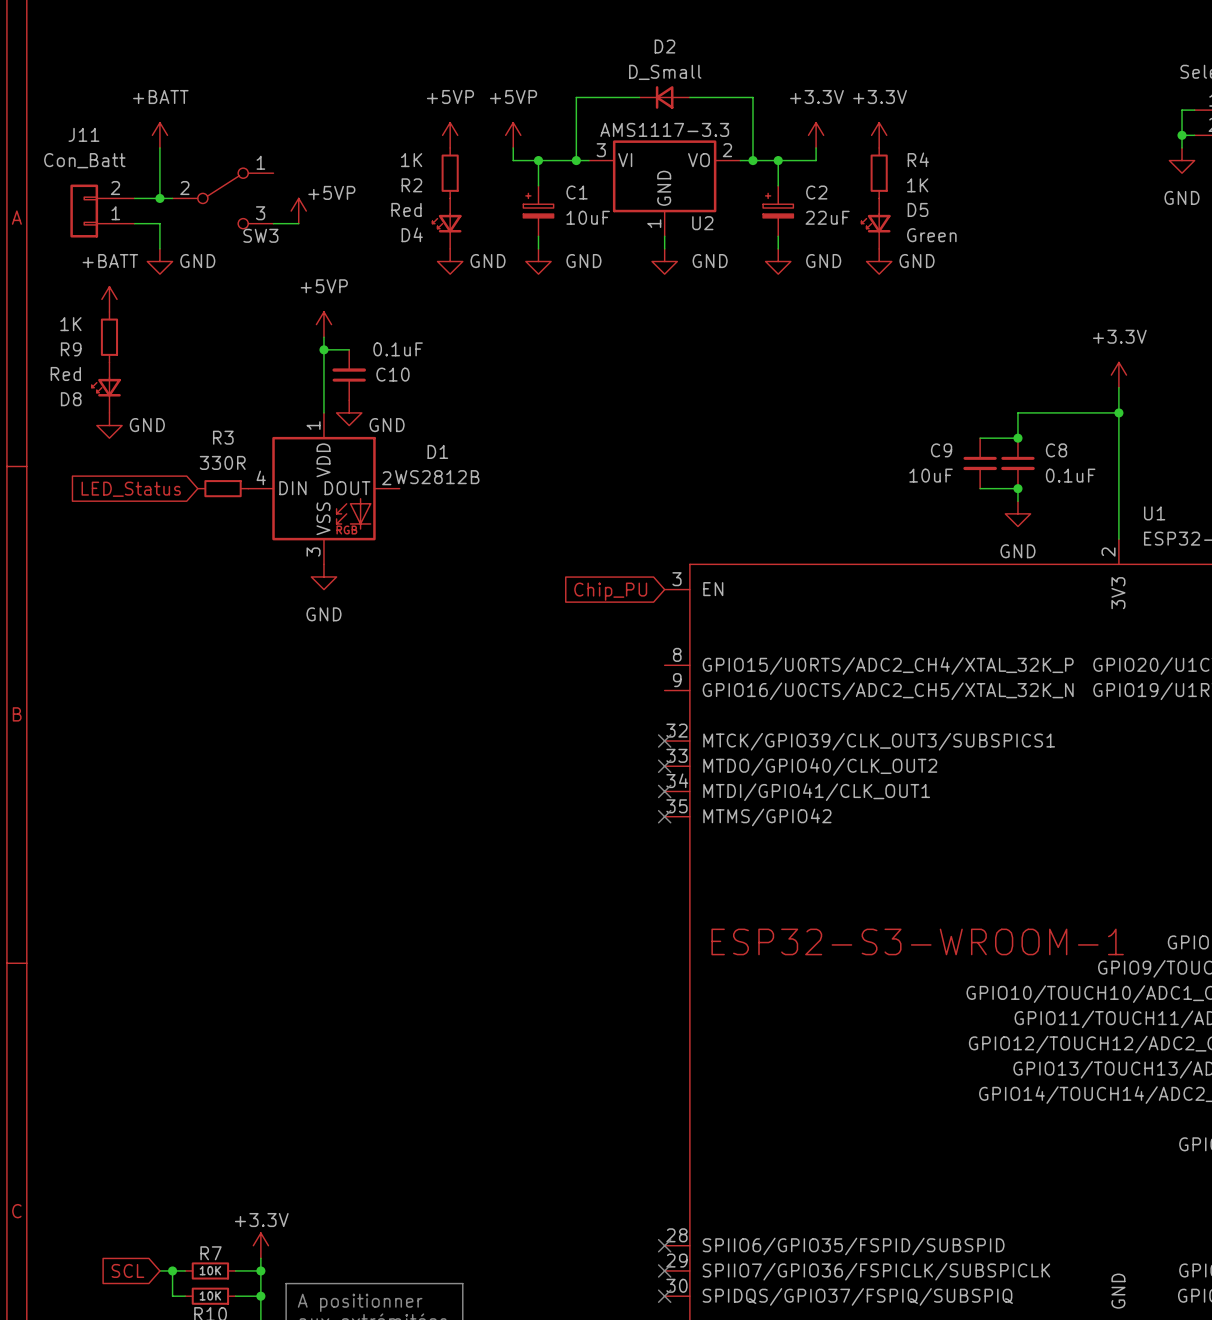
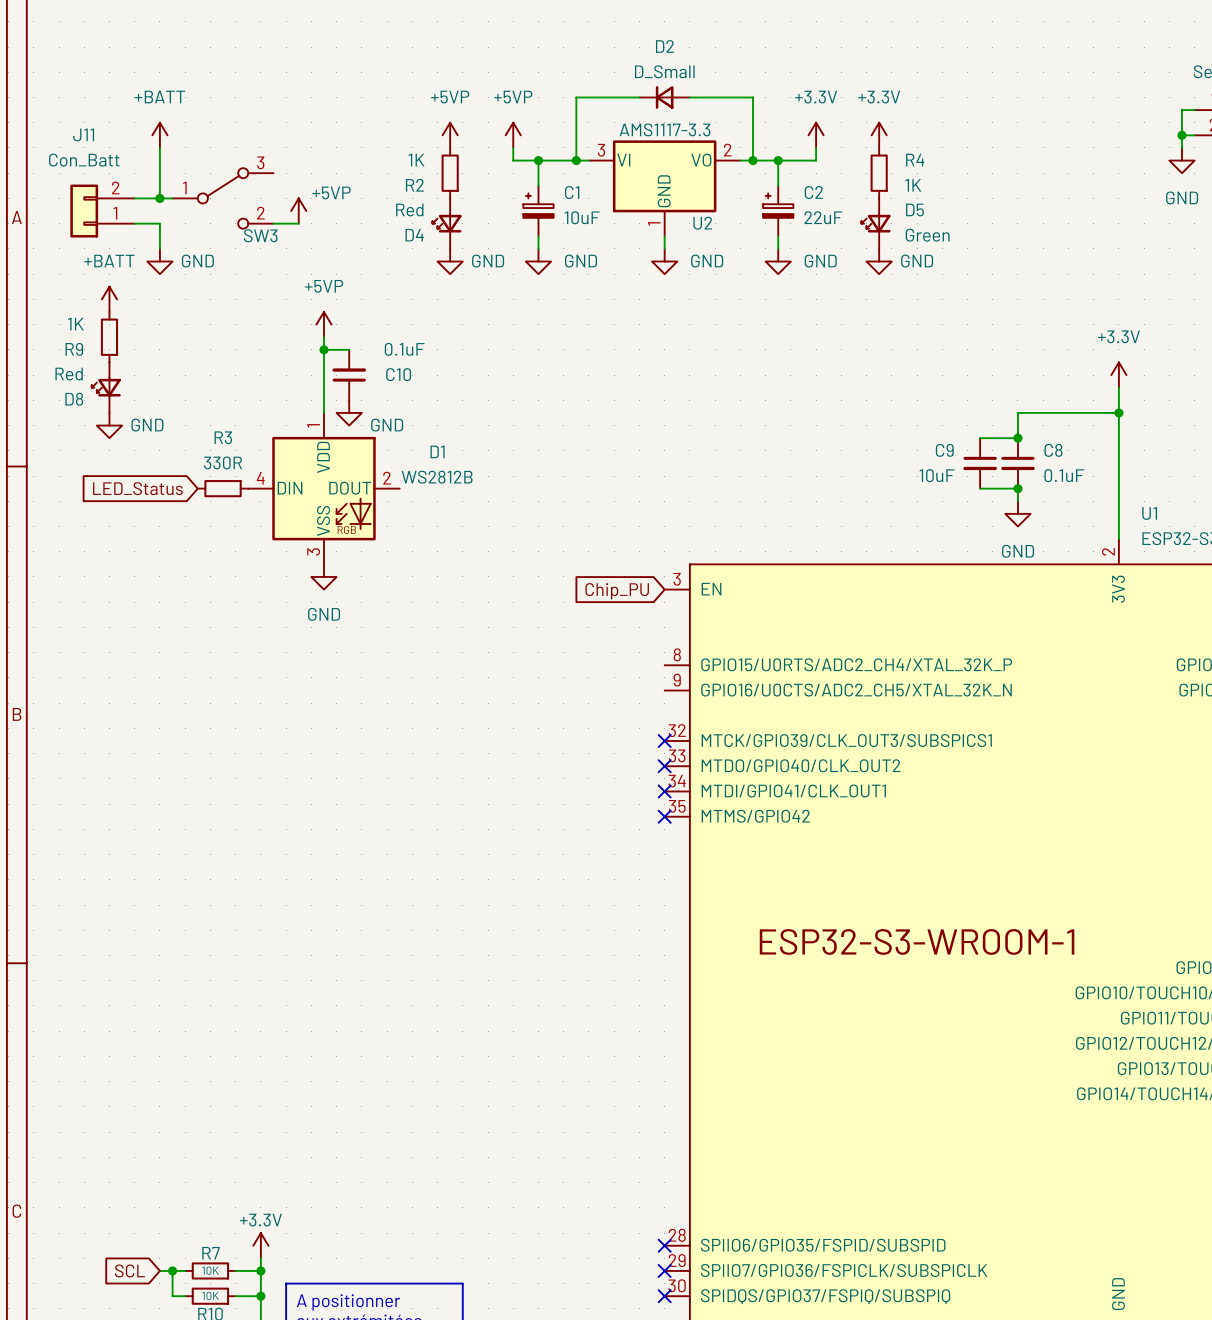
SW3 pin number: 1 (260, 162) -> 3 (260, 162)
SW3 pin number: 2 (184, 188) -> 1 (184, 188)
SW3 pin number: 3 (260, 213) -> 2 (260, 213)

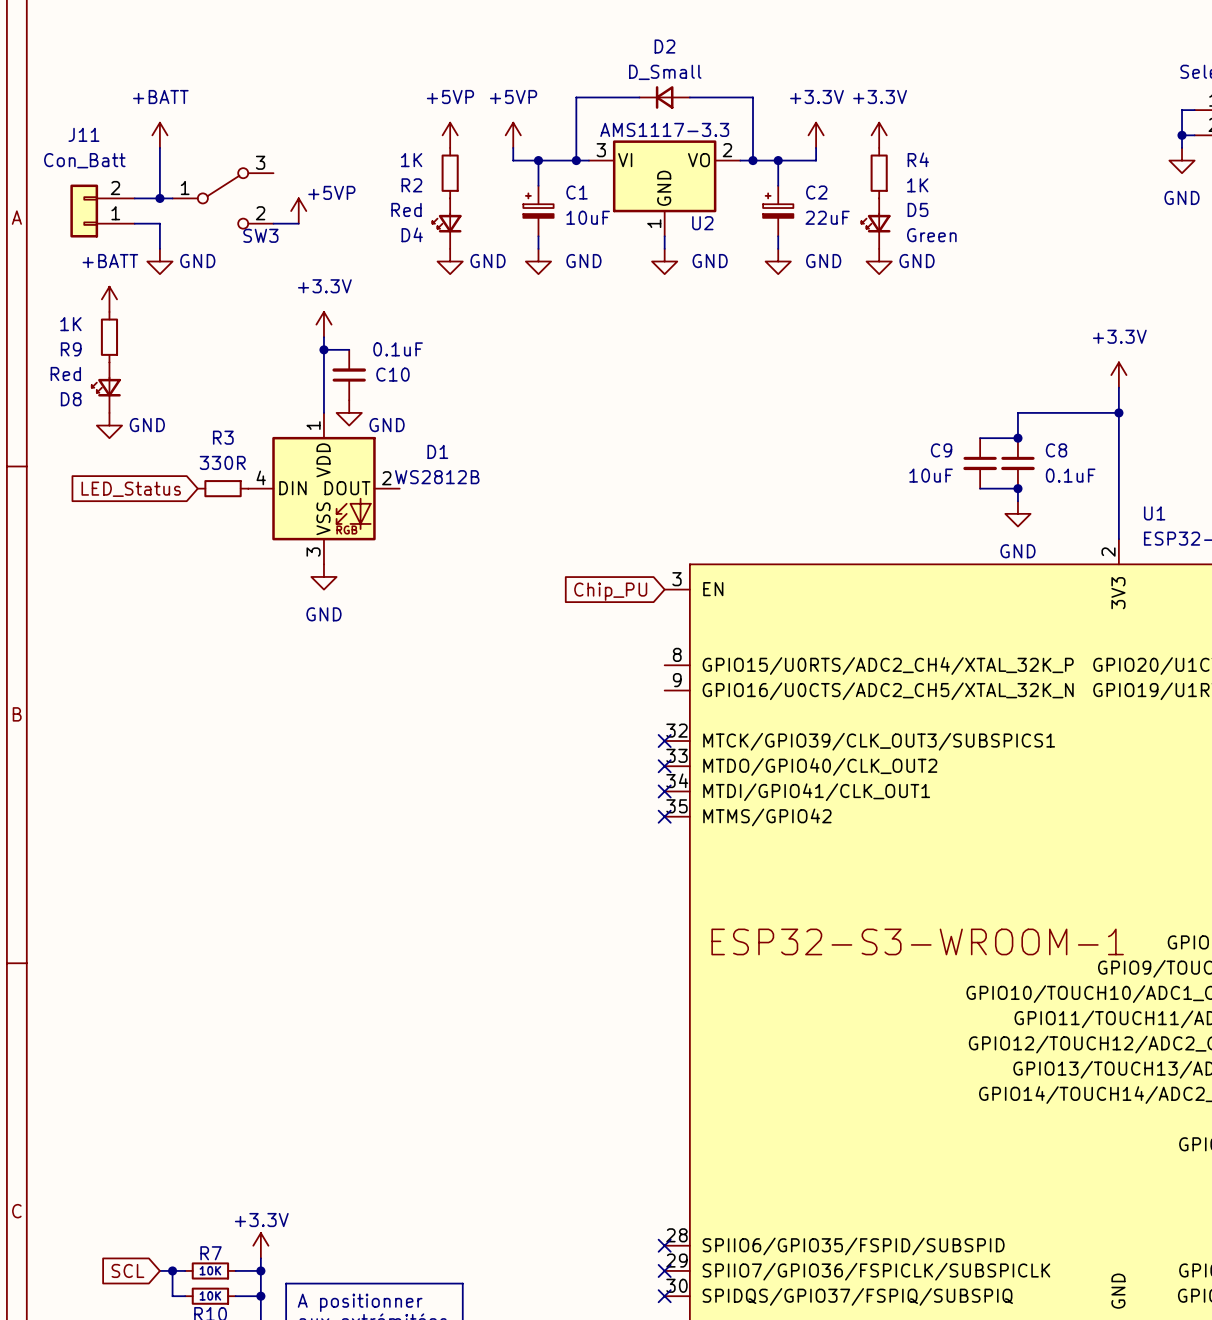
power symbol: +5VP (323, 324) -> +3.3V (323, 324)

